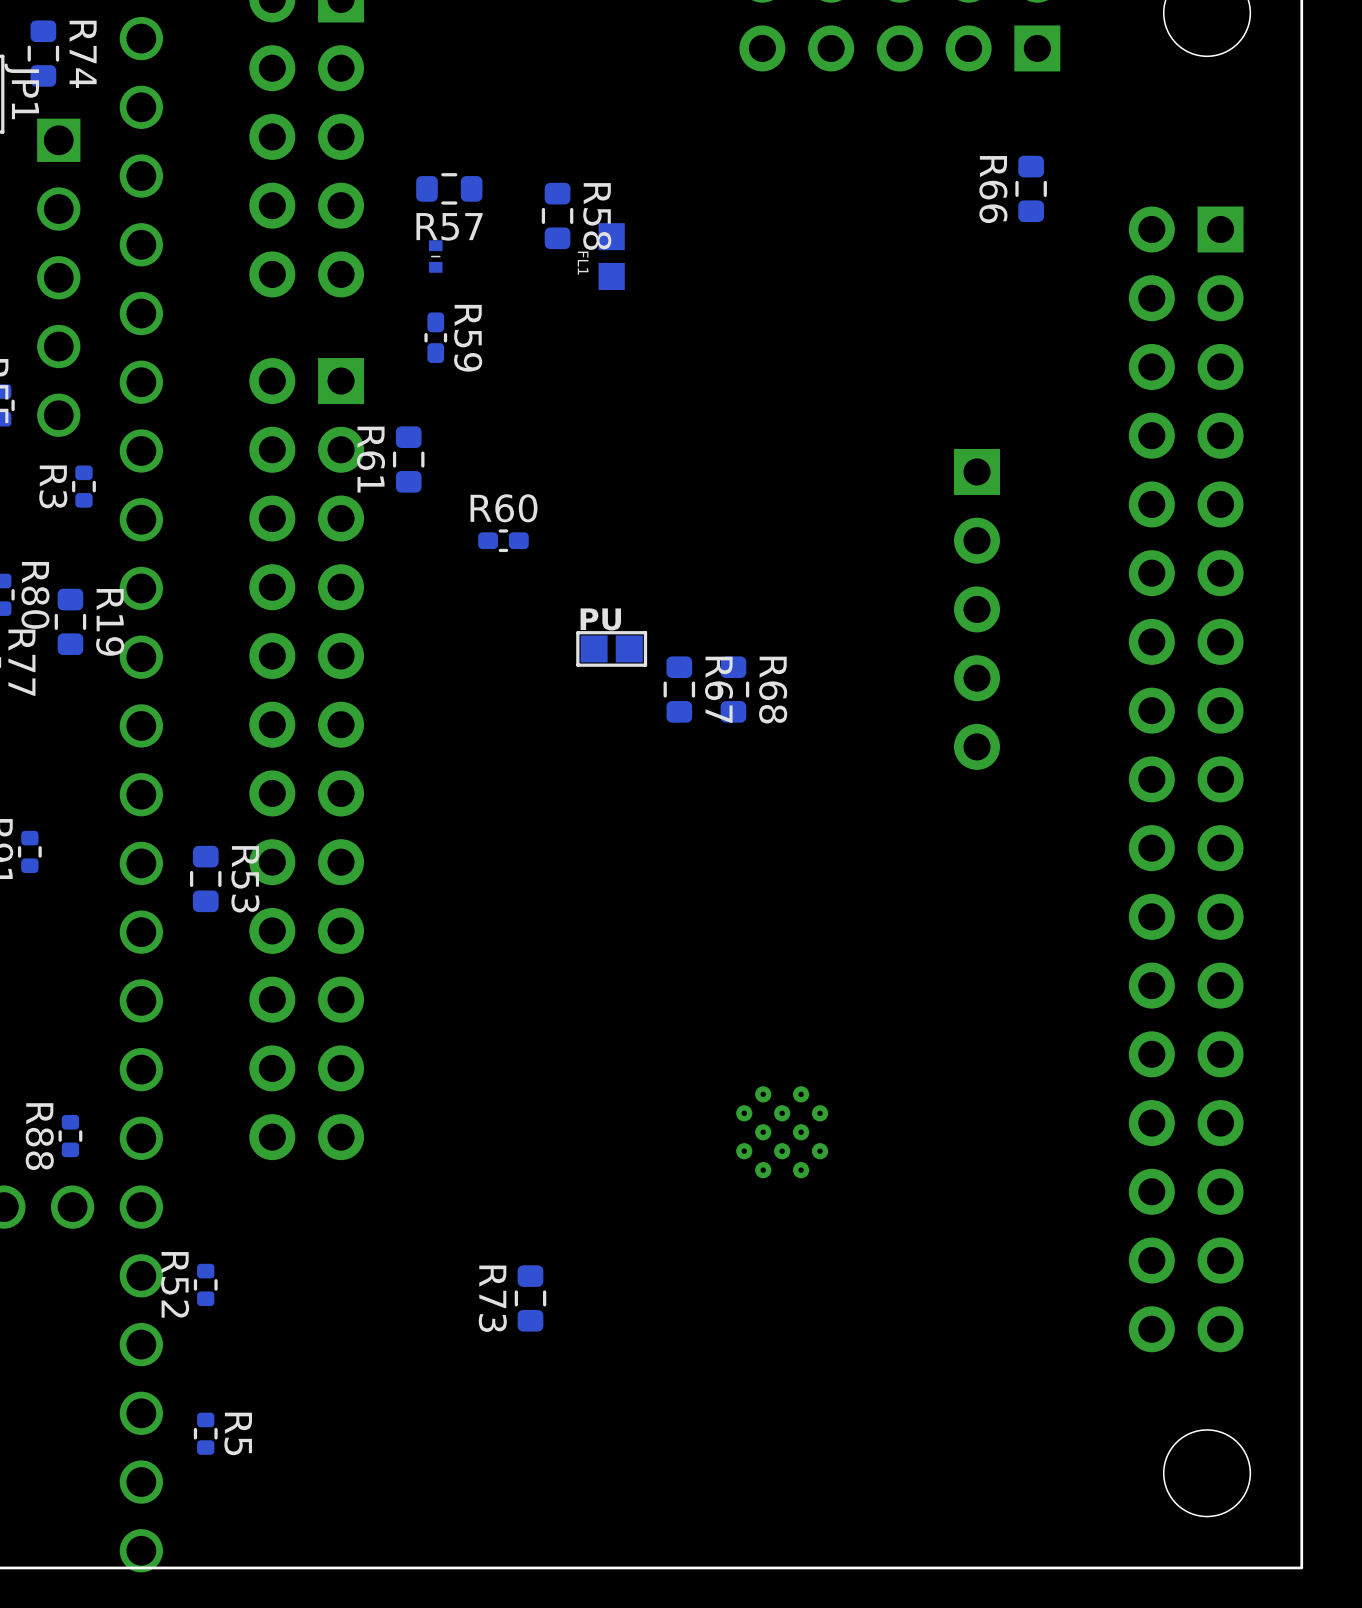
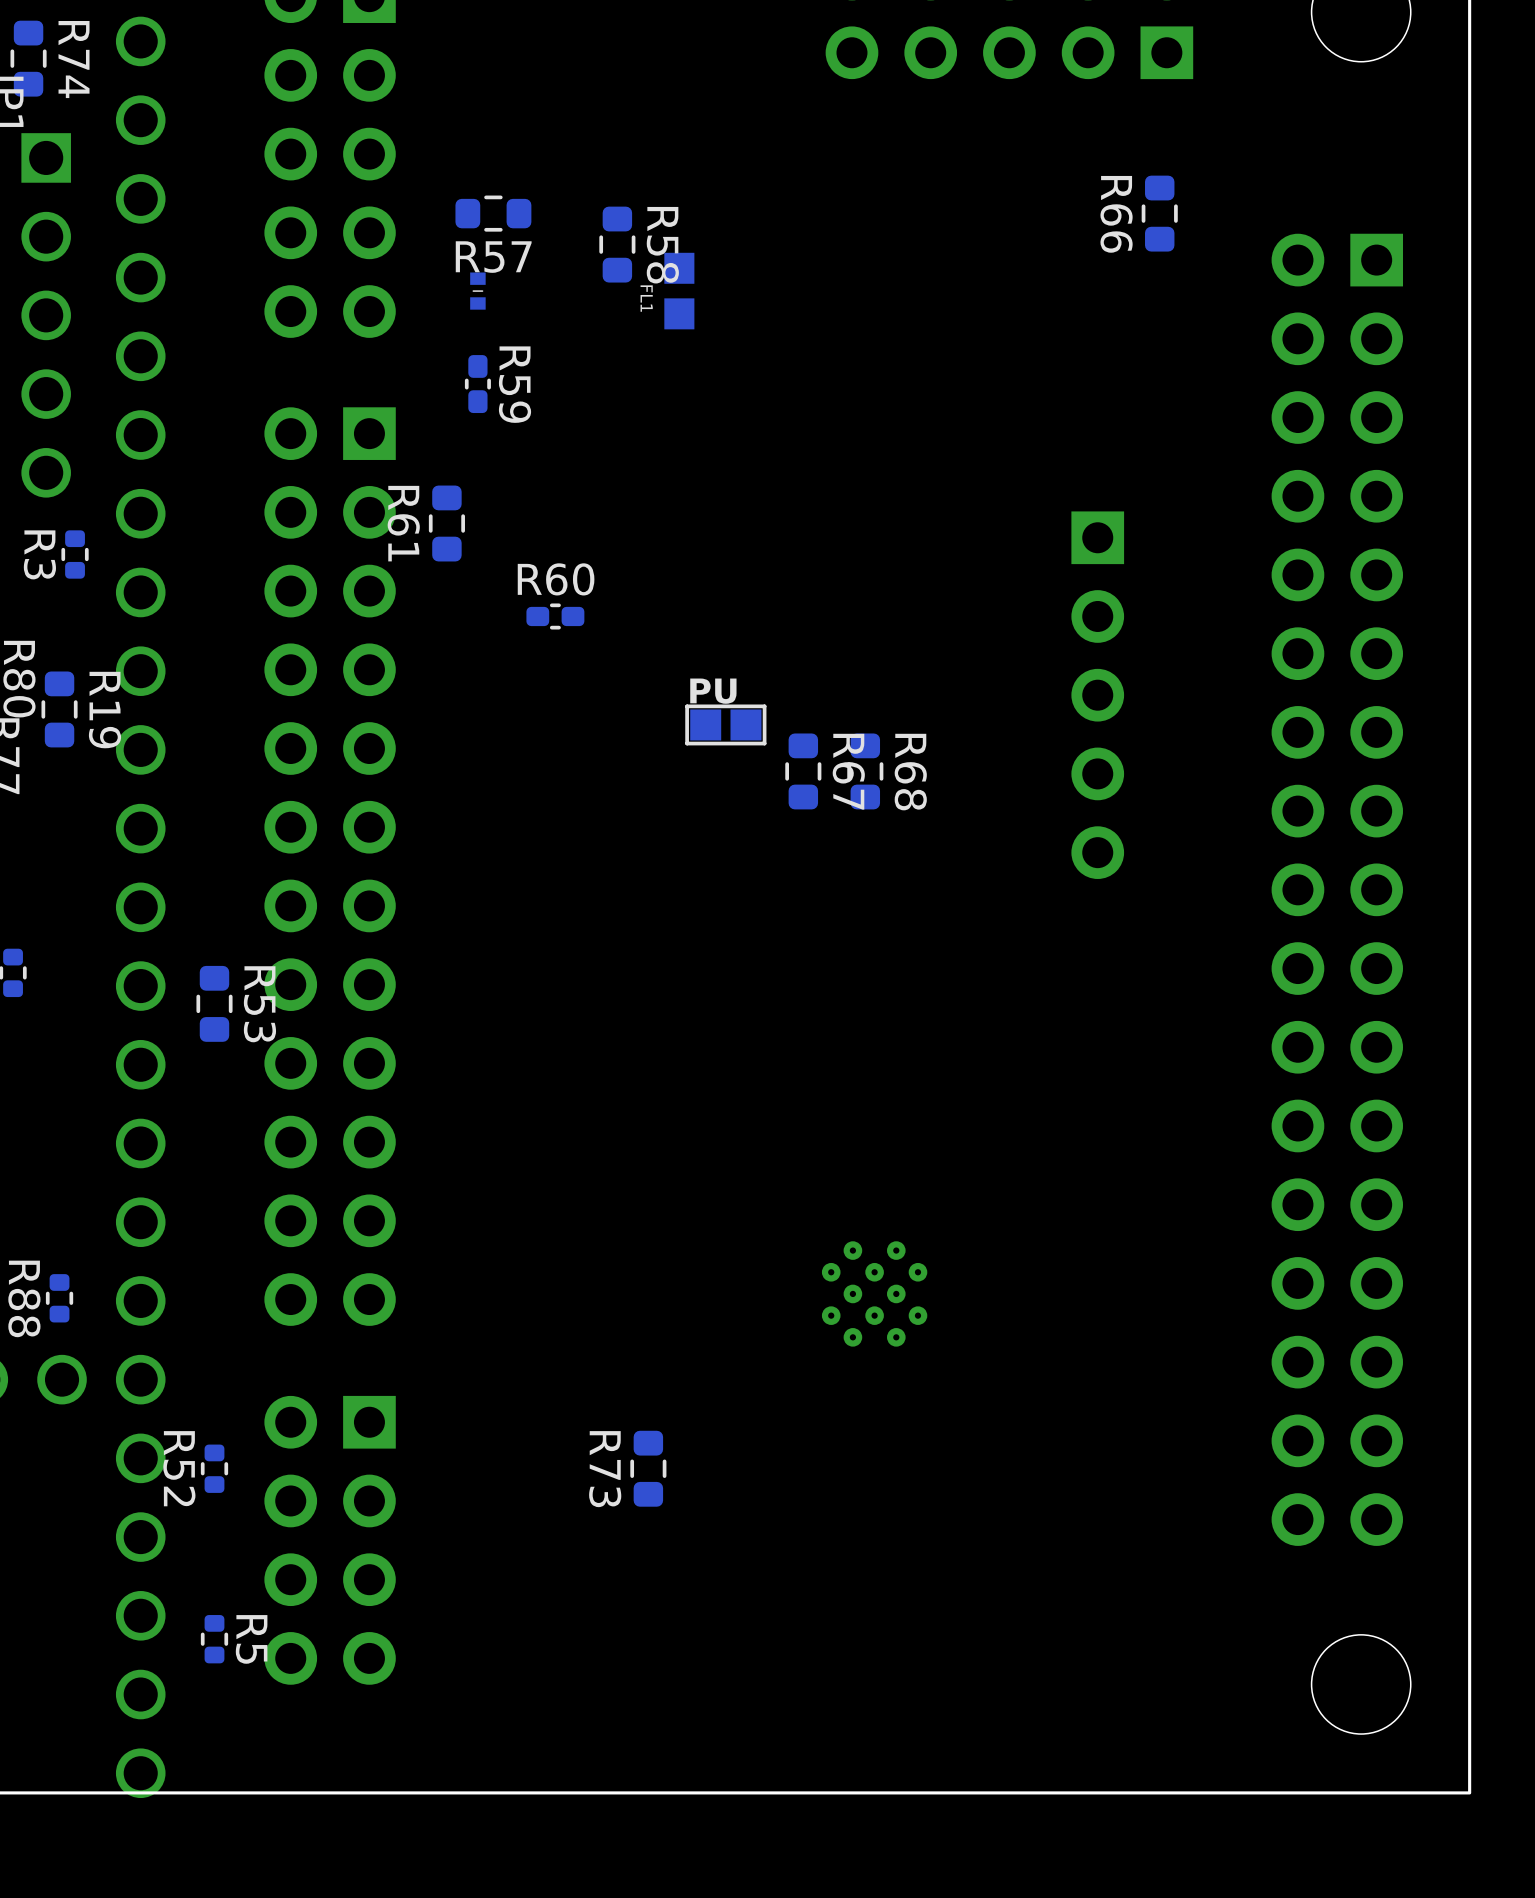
part position: (611, 648) -> (725, 724)
R67 position: (679, 689) -> (803, 771)
R68 position: (733, 689) -> (865, 771)
R73 position: (530, 1298) -> (648, 1468)
part: none -> (330, 1540)

